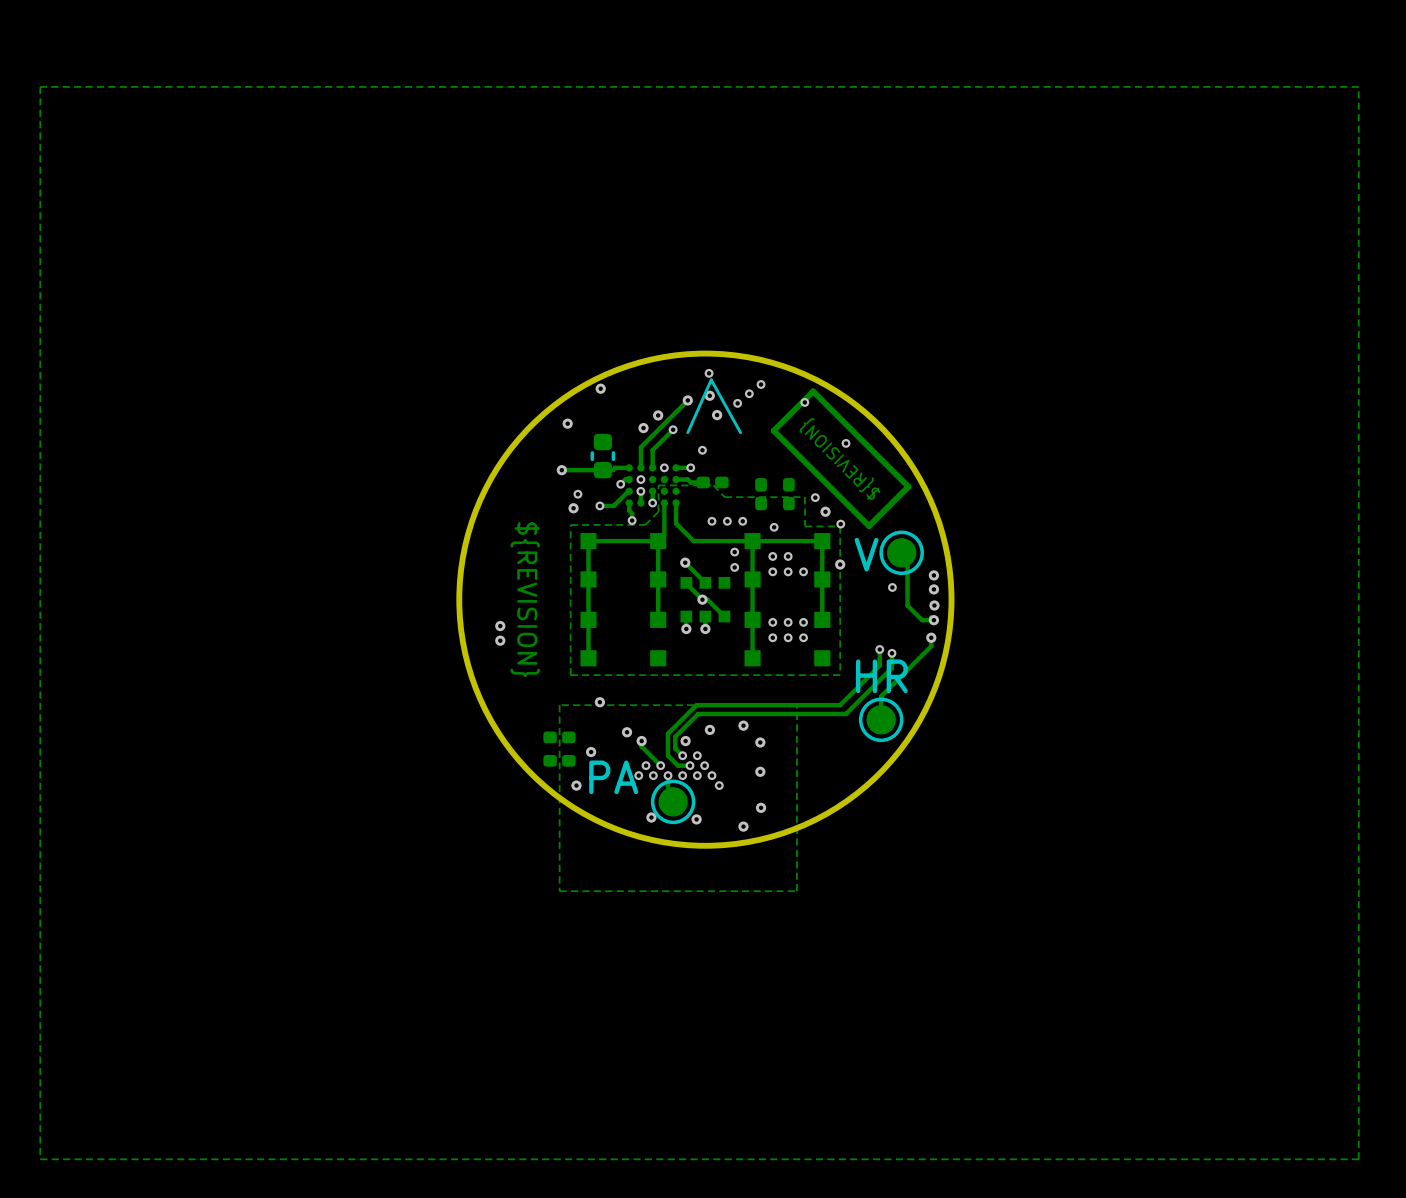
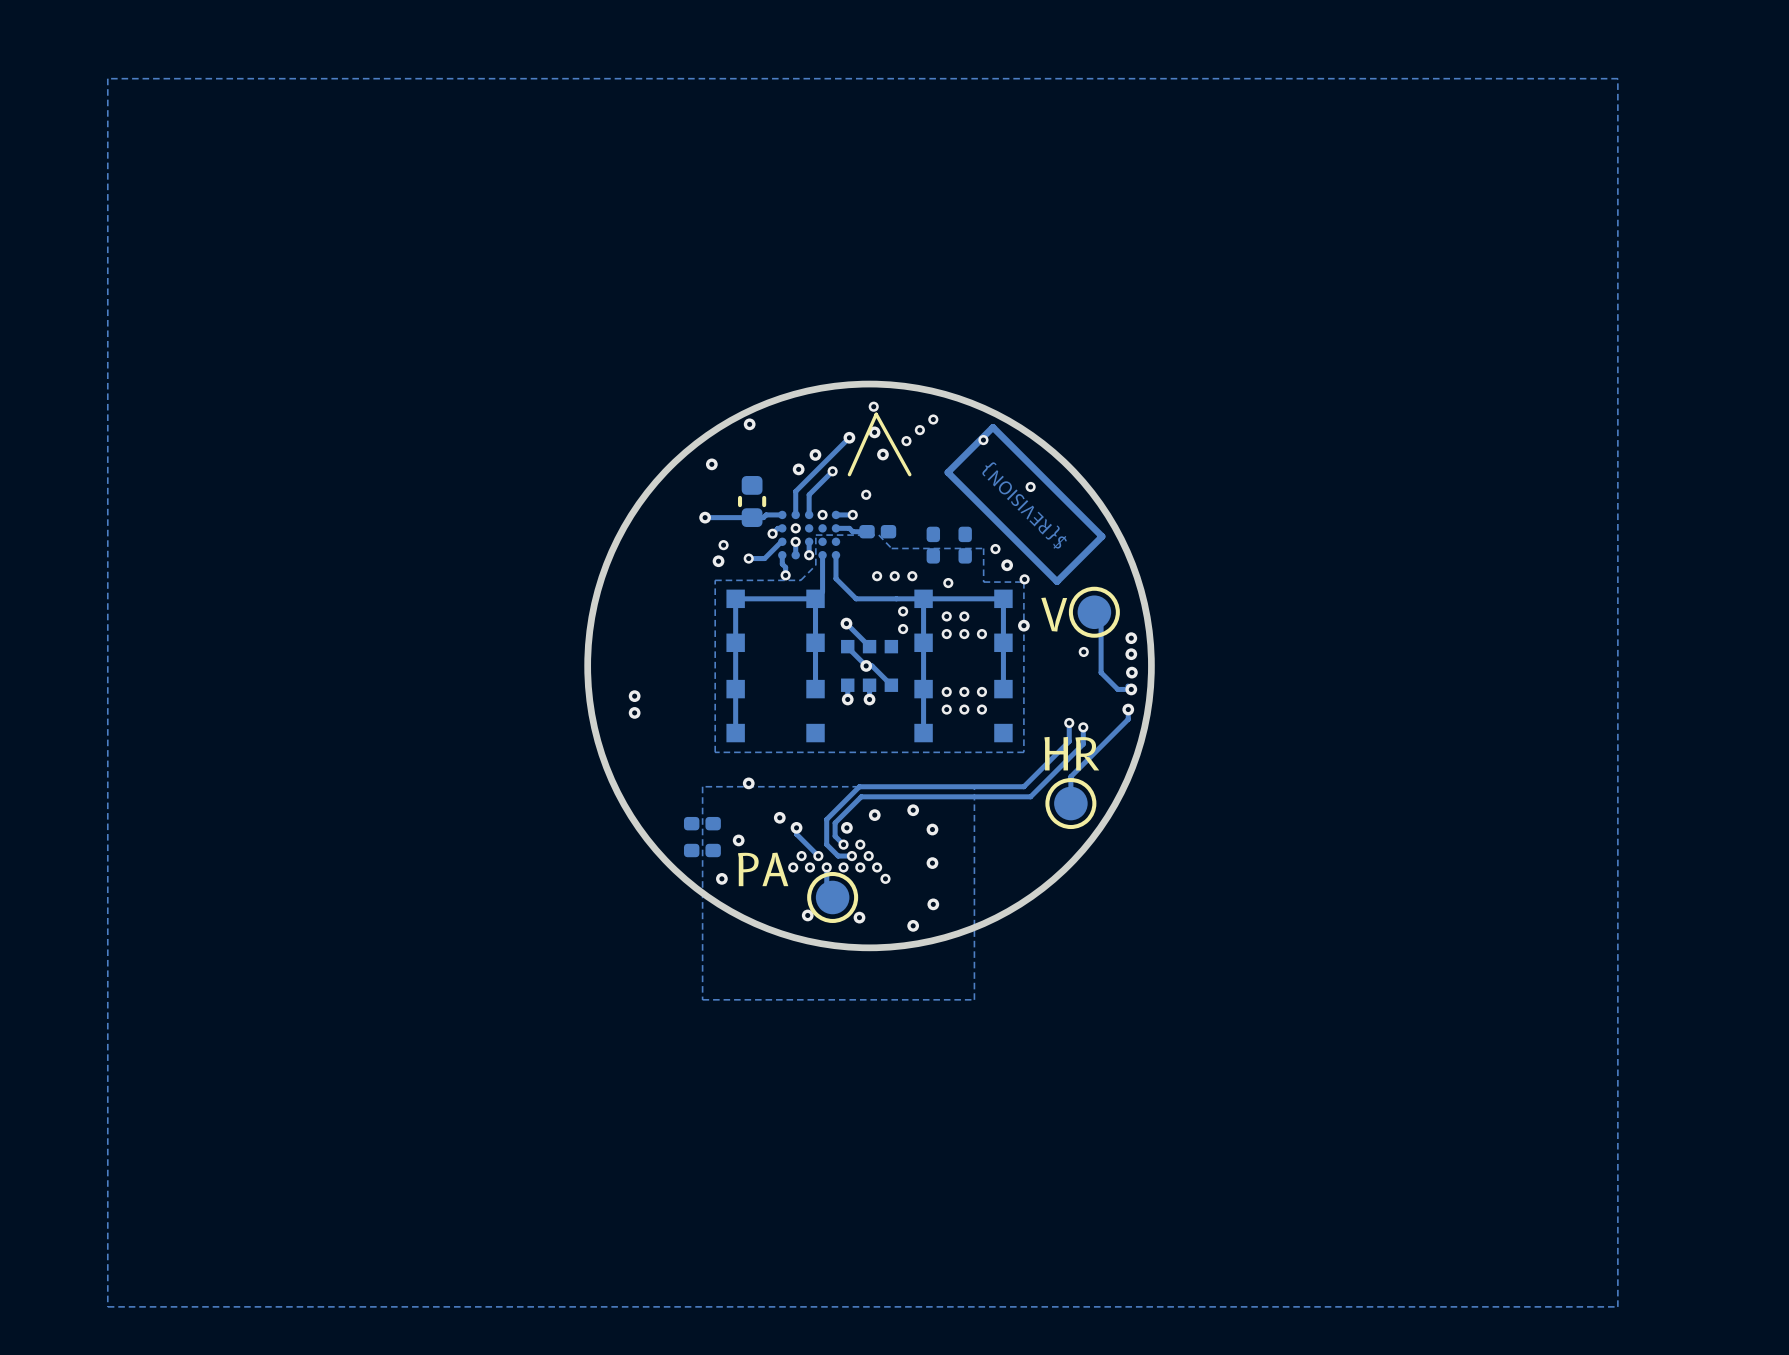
text: ${REVISION} (525, 599) -> none

